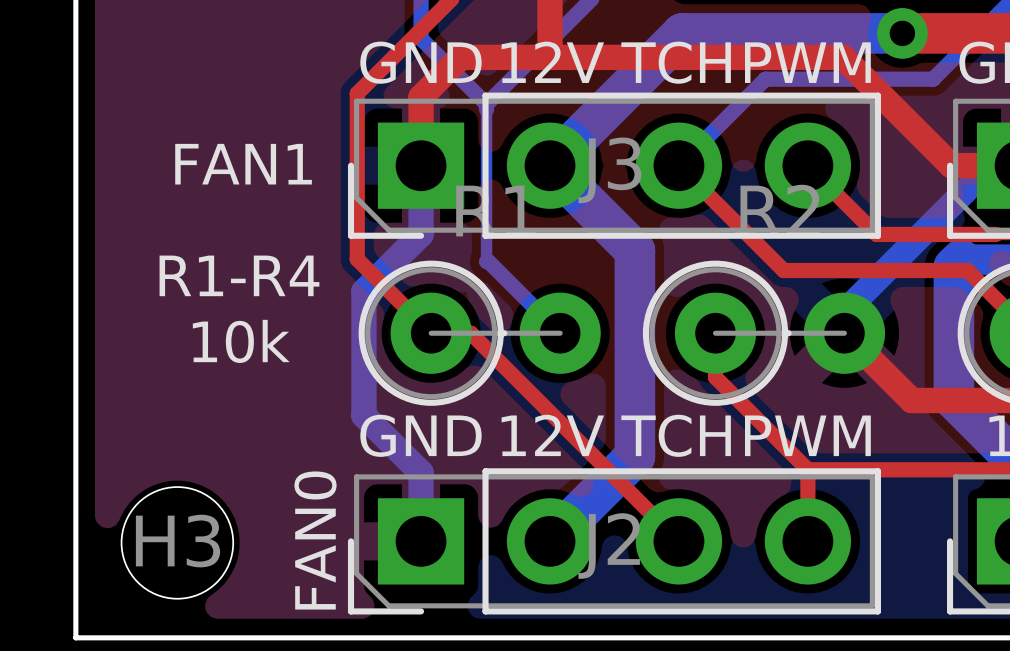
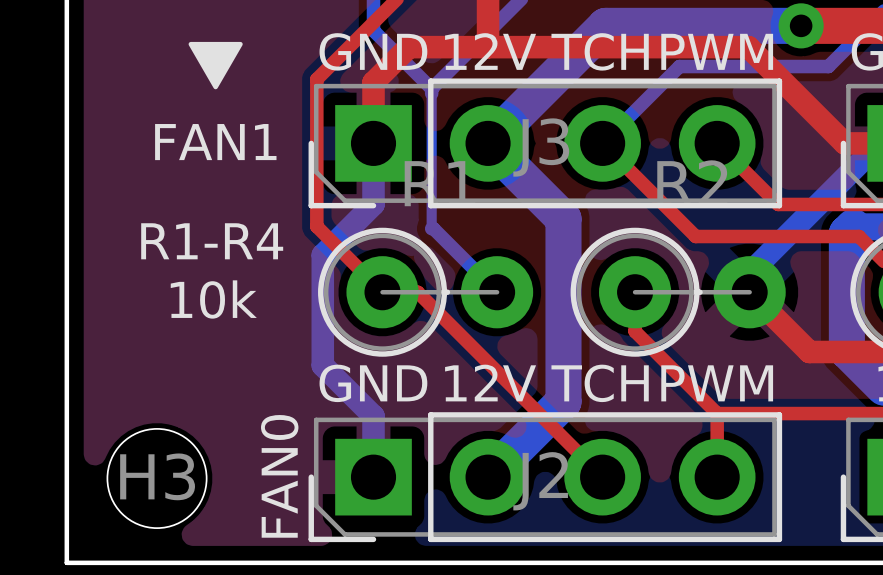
drawing: none -> [188, 41, 243, 90]

